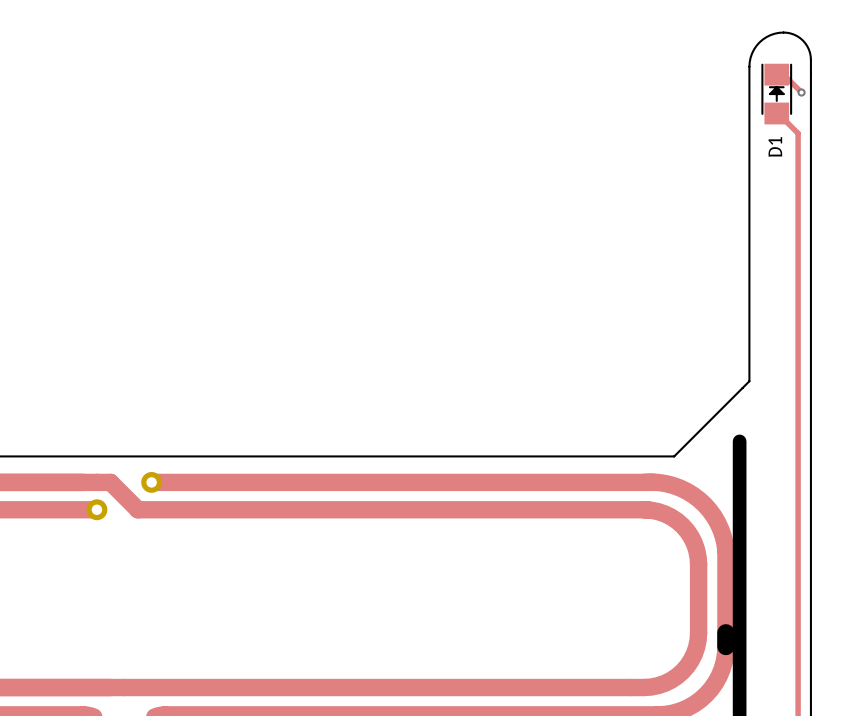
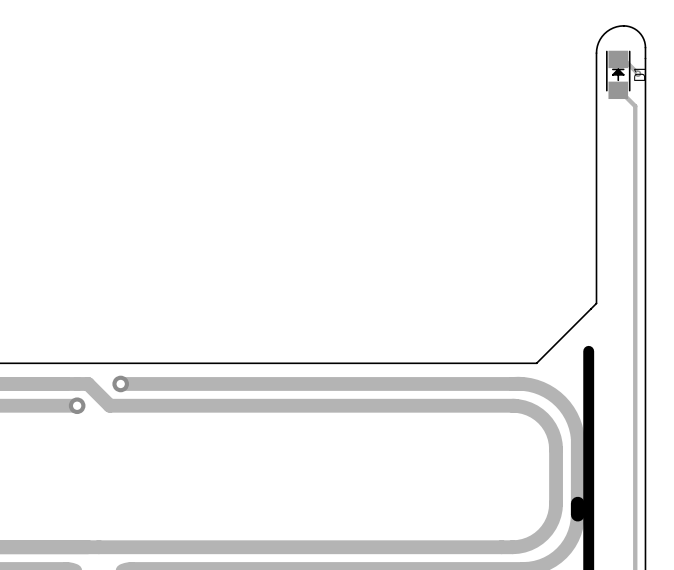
D1 name position: D1 (775, 146) -> D1 (639, 74)

